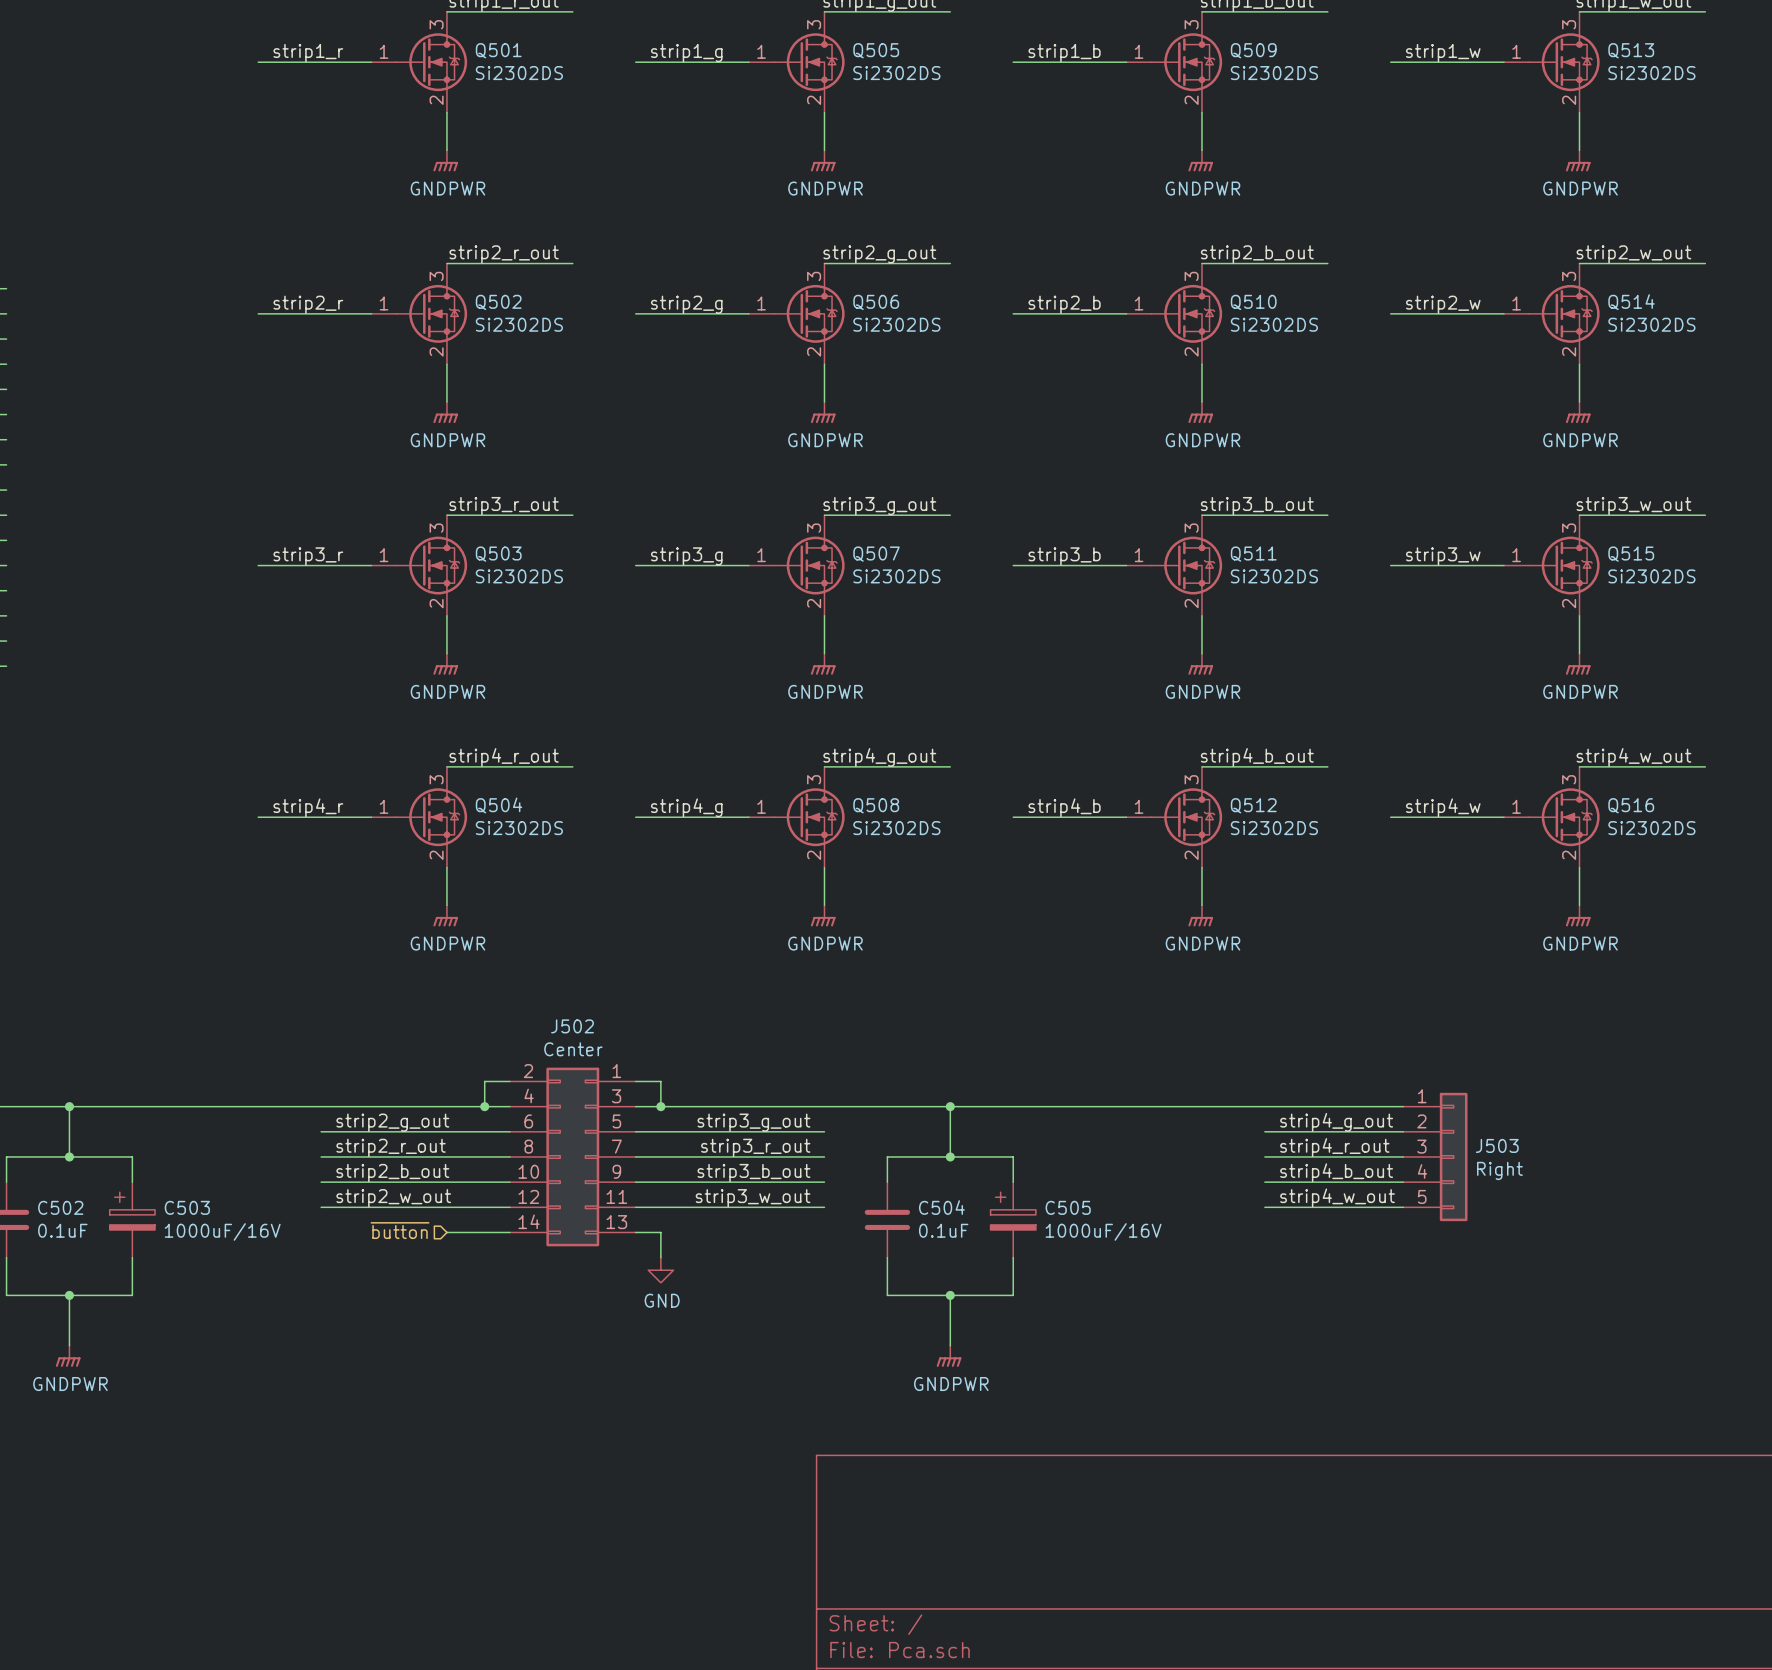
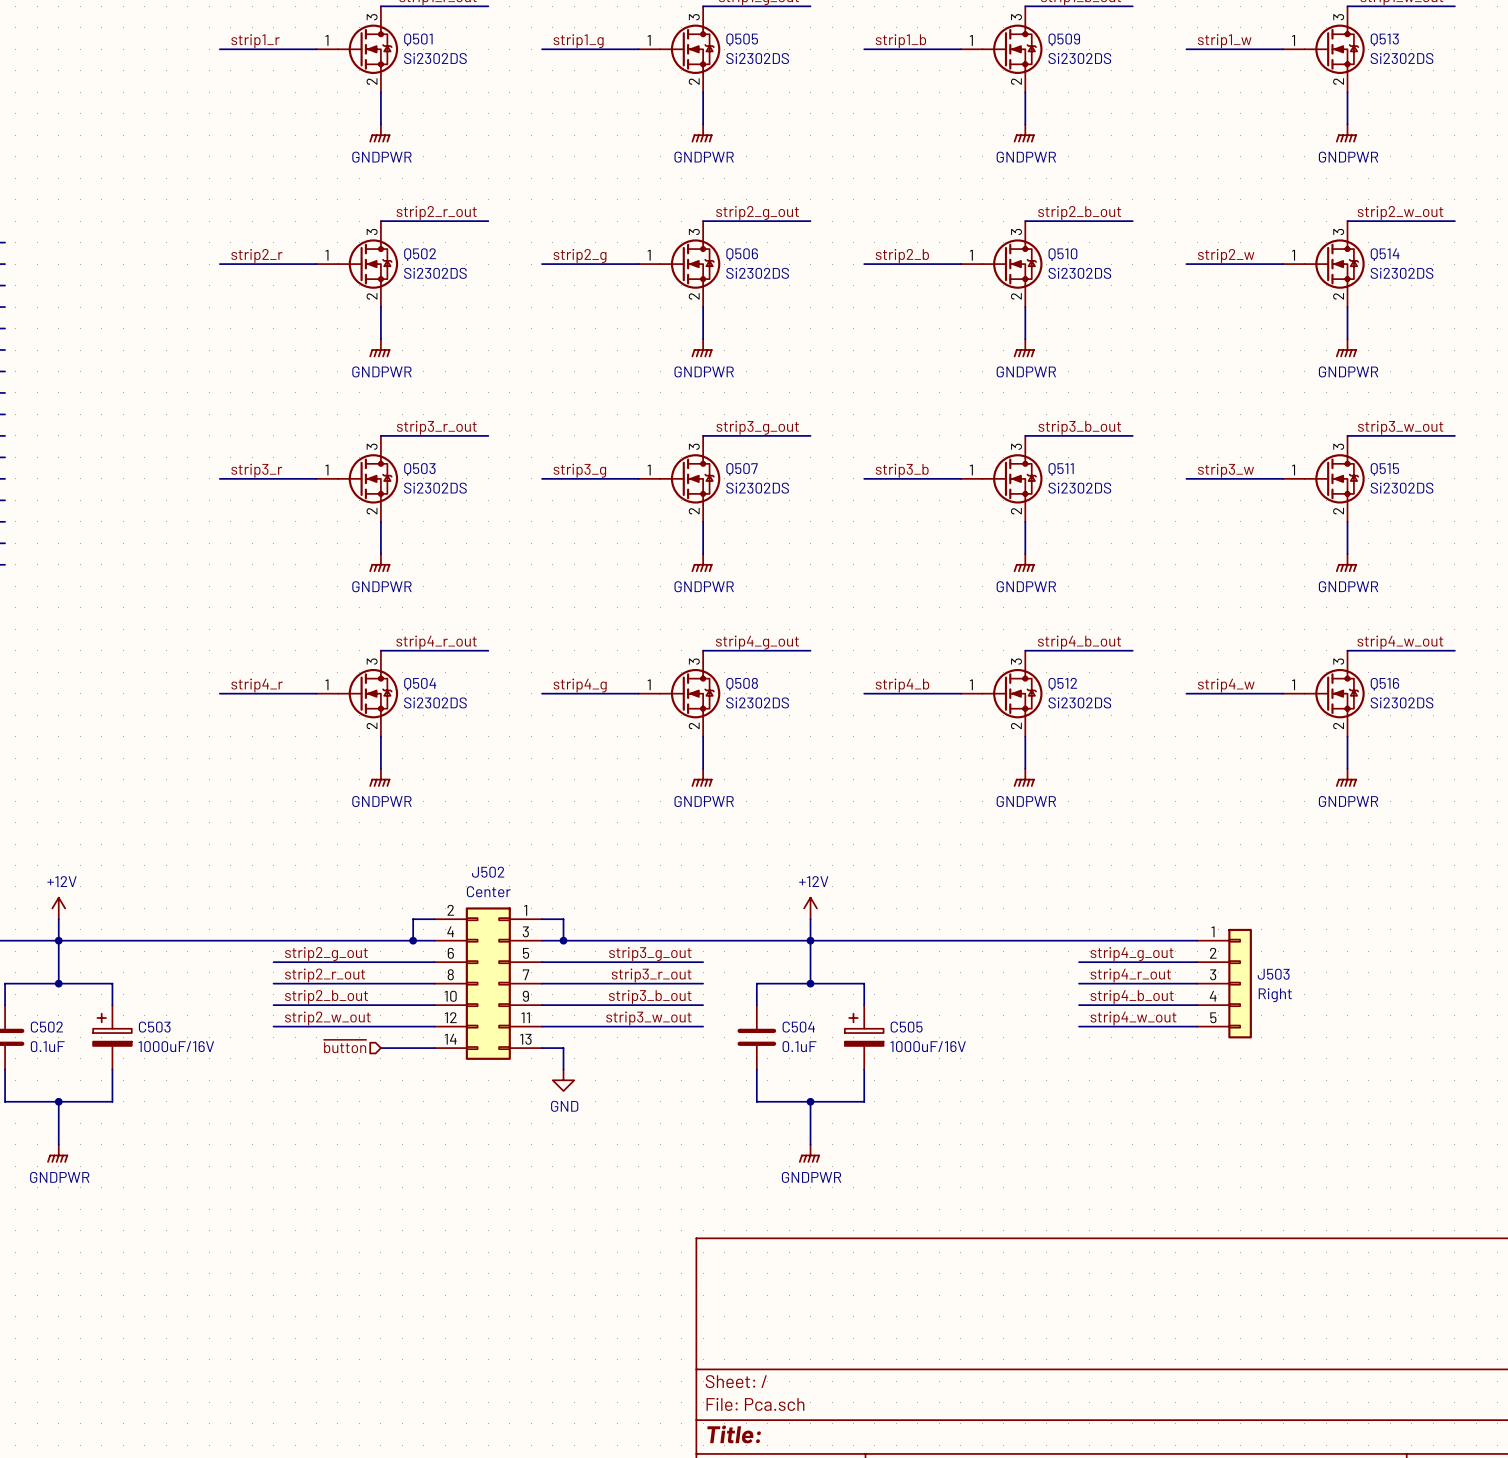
power symbol: none -> +12V (58, 908)
power symbol: none -> +12V (810, 908)
wire: none -> (58, 919) (58, 940)
wire: none -> (810, 919) (810, 940)

